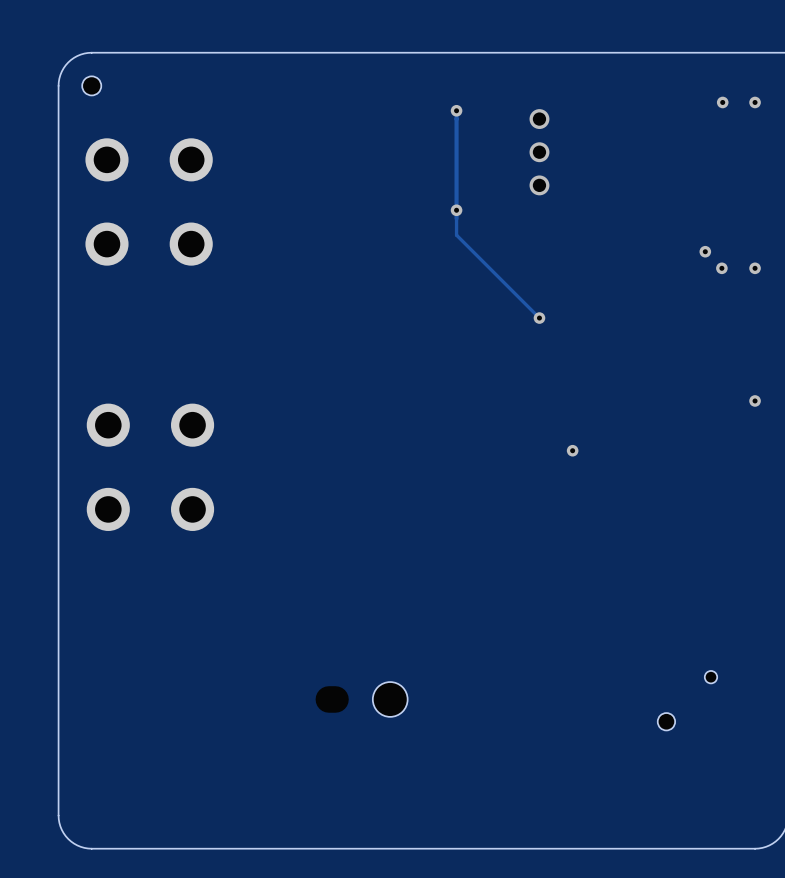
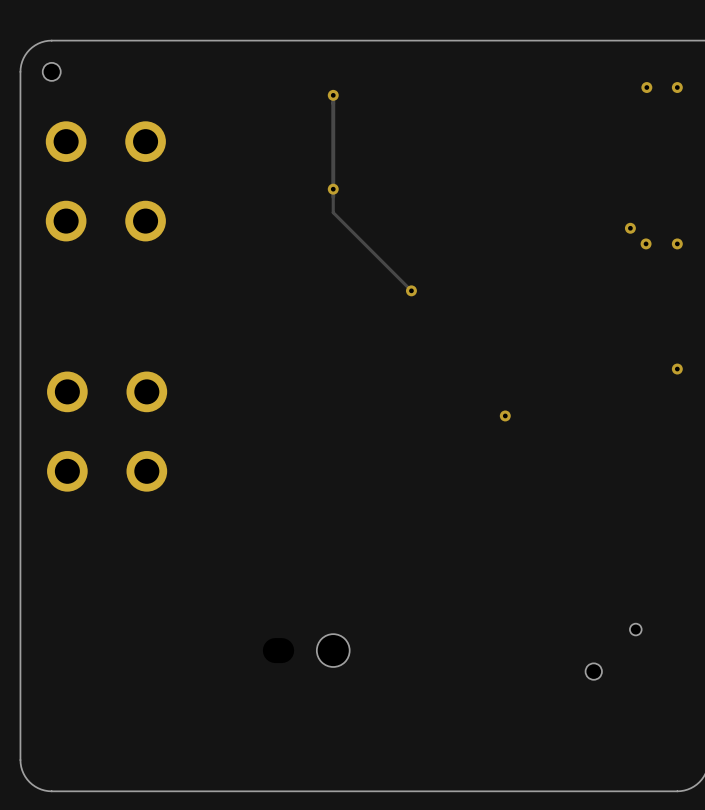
via: none -> (333, 95)
track: (456, 110) (456, 235) (539, 318) -> (333, 95) (333, 212) (411, 290)
via: (456, 110) -> none
via: (539, 119) -> none
via: (539, 152) -> none
via: (539, 185) -> none
via: none -> (333, 189)
via: (456, 210) -> none
via: none -> (411, 290)
via: (539, 318) -> none

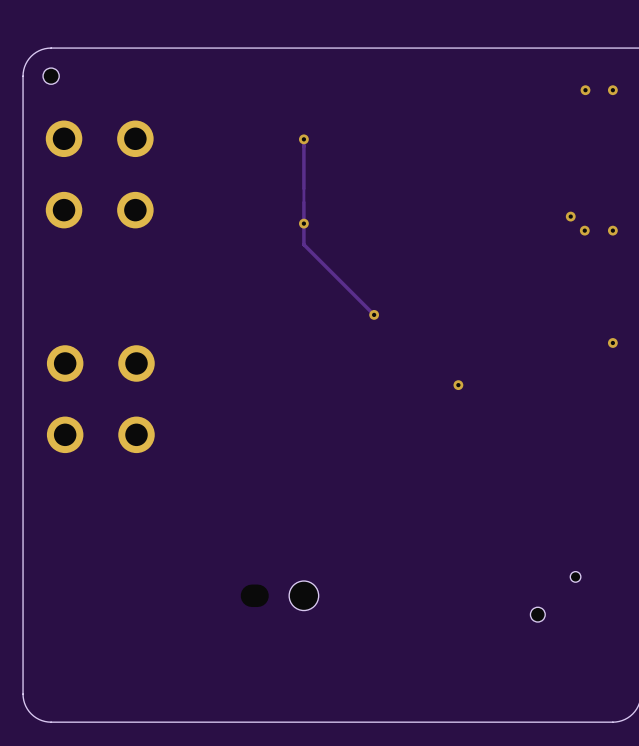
track: (333, 95) (333, 142) -> none
via: (333, 95) -> none
via: none -> (303, 139)
via: (333, 189) -> none
track: (333, 212) (411, 290) -> (303, 202) (303, 244) (374, 314)
via: none -> (303, 223)
via position: (411, 290) -> (374, 314)

